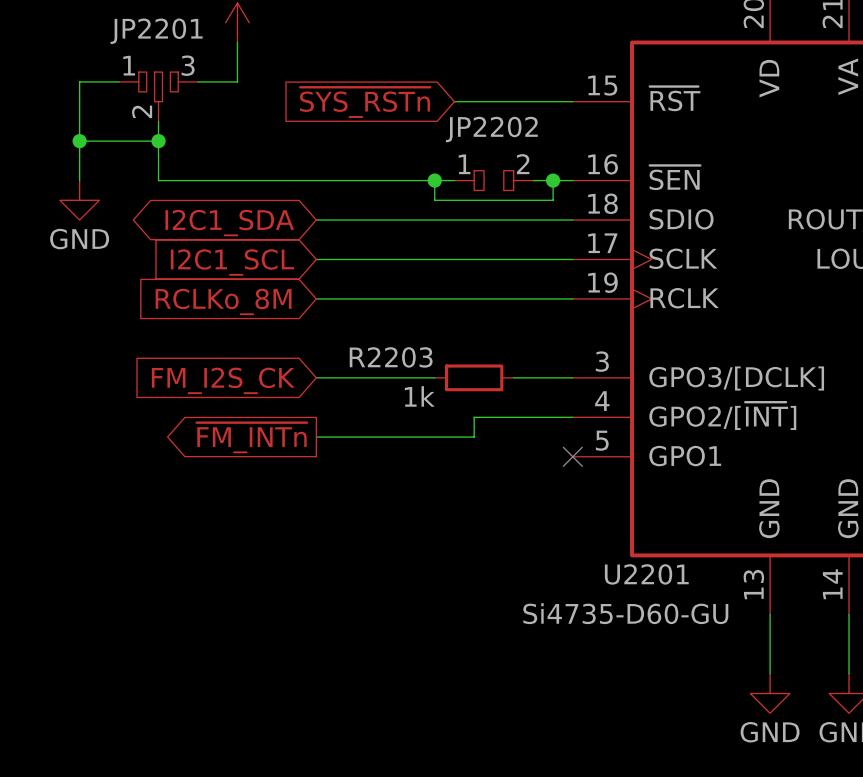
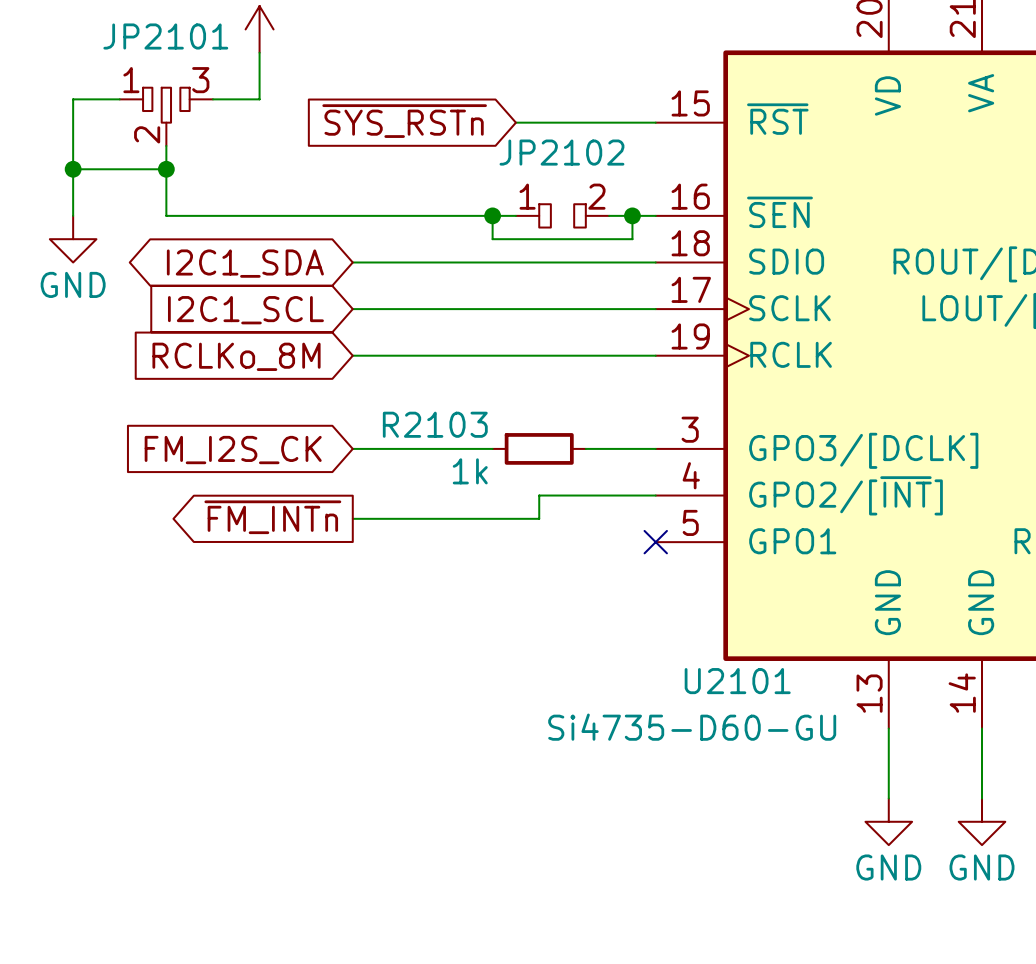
JP2201 name: JP2201 (156, 31) -> JP2101 (165, 36)
JP2202 name: JP2202 (491, 129) -> JP2102 (561, 152)
R2203 name: R2203 (391, 357) -> R2103 (435, 424)
U2201 name: U2201 (646, 574) -> U2101 (737, 681)

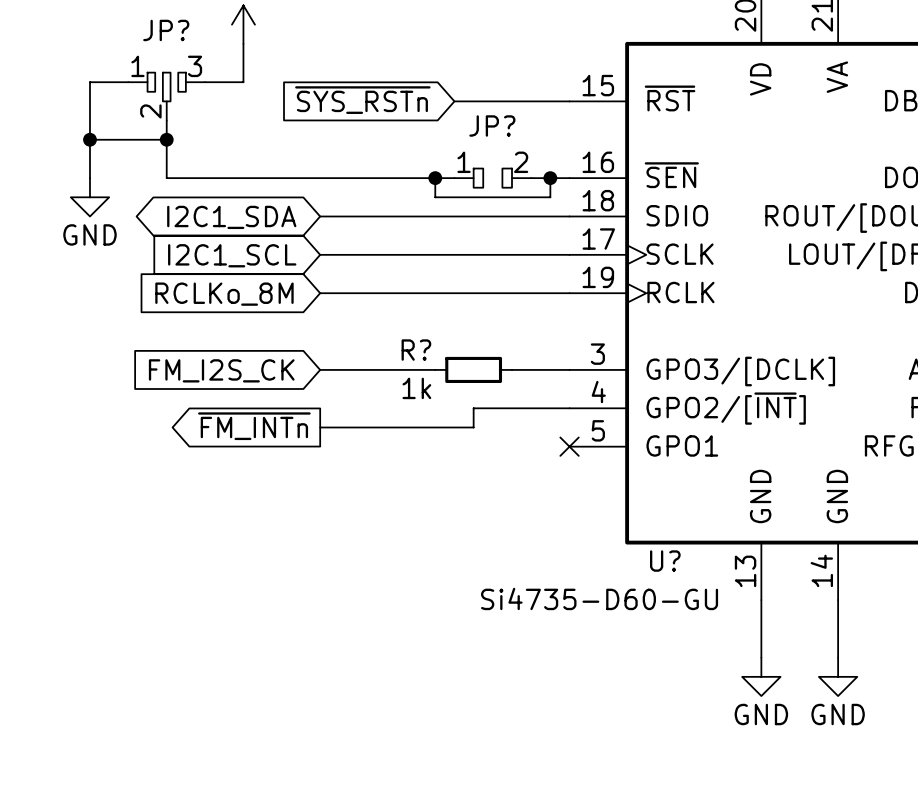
JP2101 name: JP2101 (165, 36) -> JP? (166, 30)
JP2102 name: JP2102 (561, 152) -> JP? (492, 125)
R2103 name: R2103 (435, 424) -> R? (416, 350)
U2101 name: U2101 (737, 681) -> U? (665, 561)

